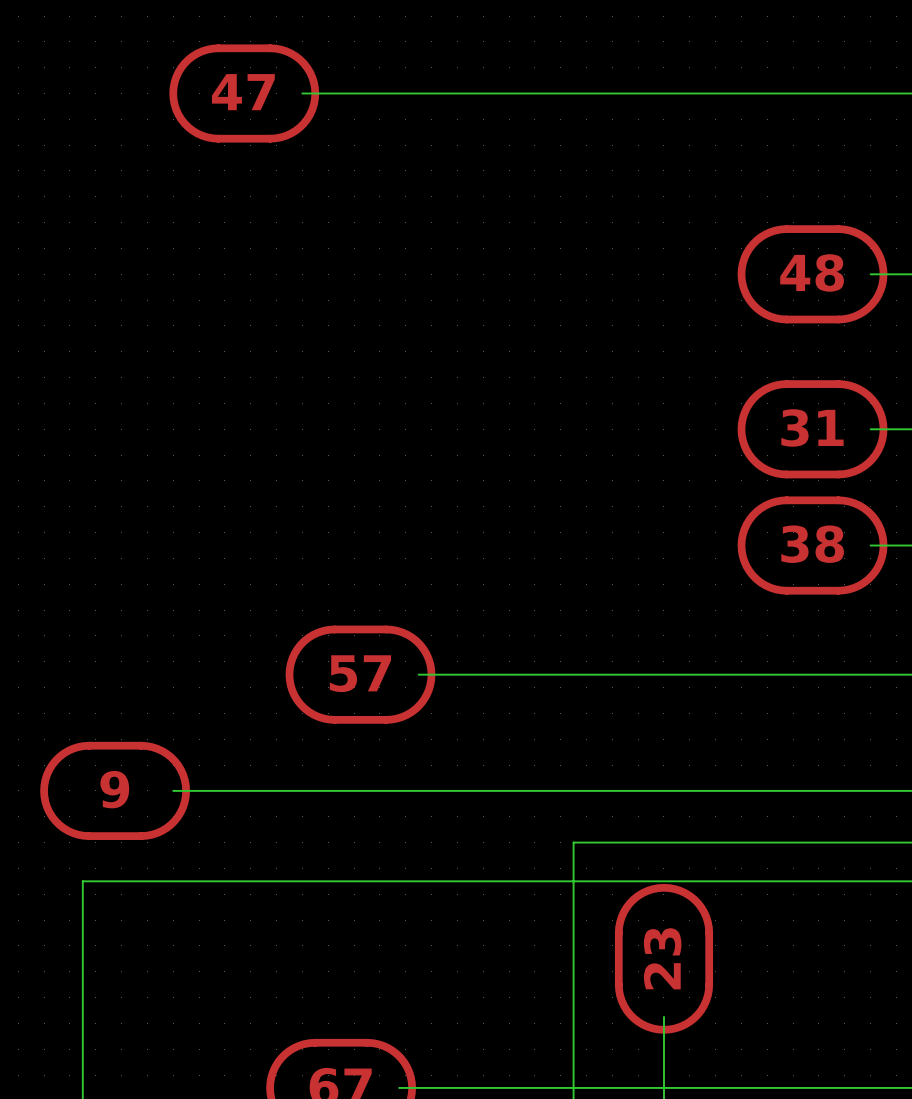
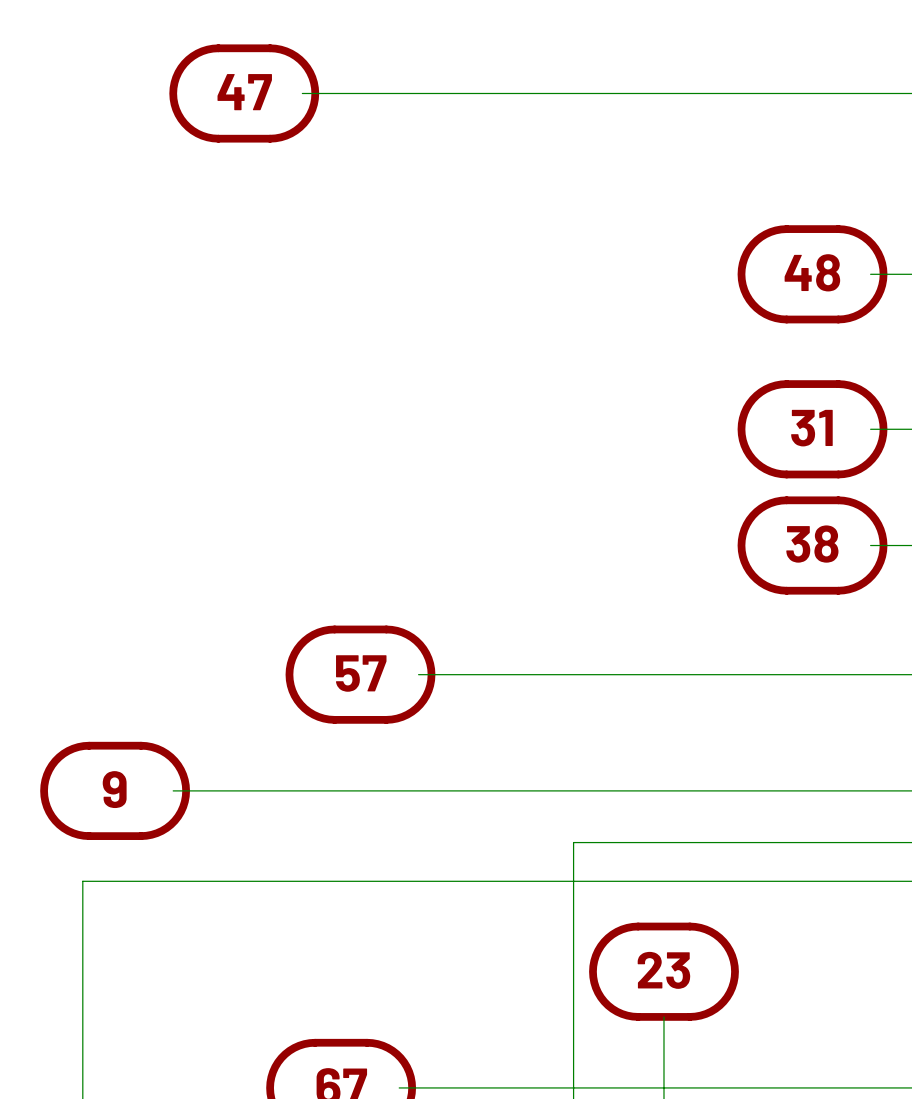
part rotation: 0° (663, 958) -> 90° clockwise (663, 971)

